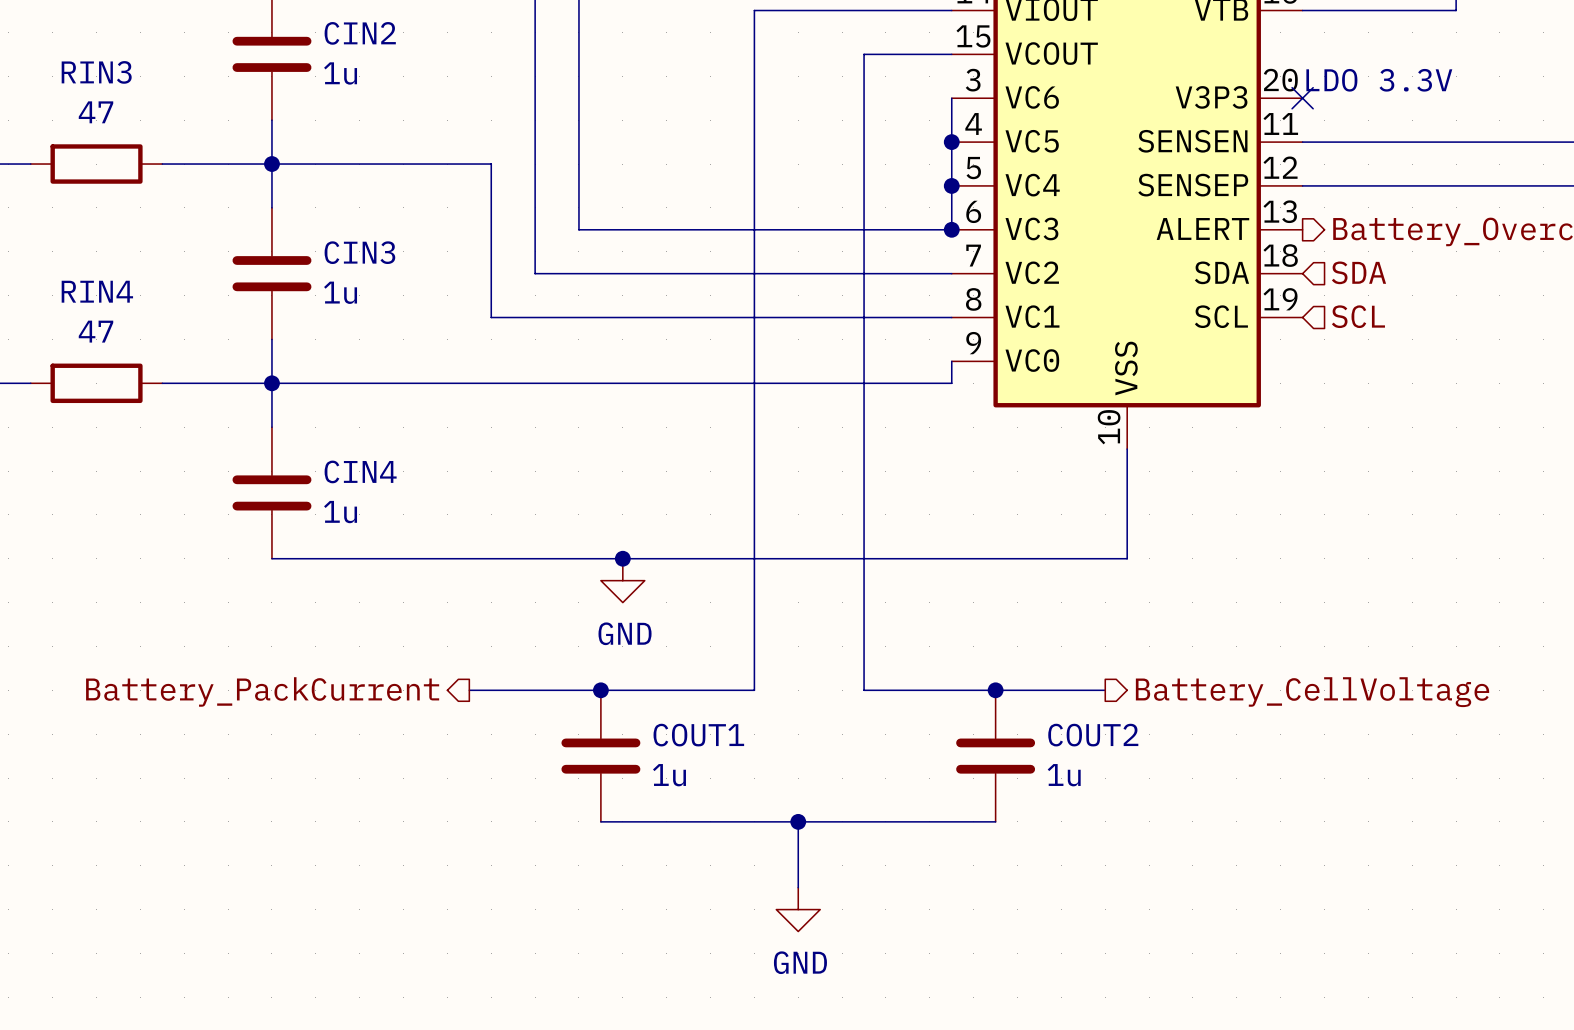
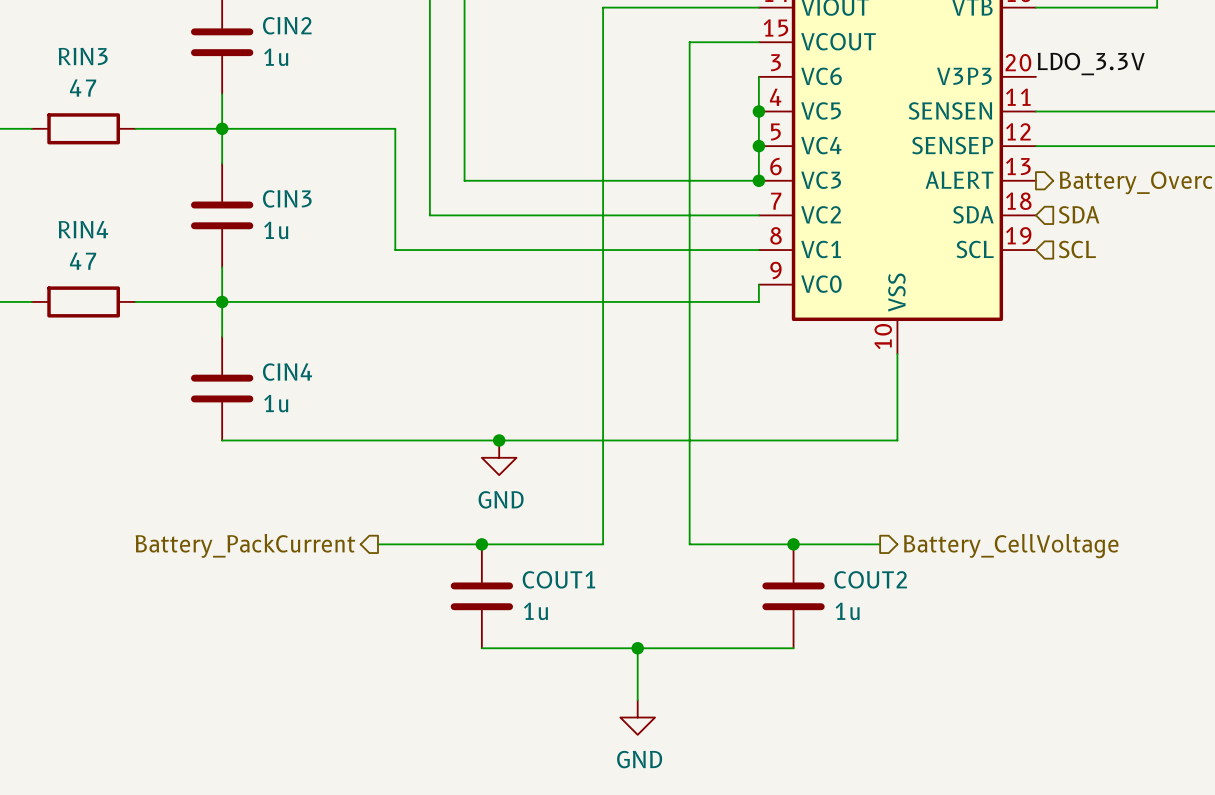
text: LDO 3.3V (1379, 80) -> none
label: none -> LDO_3.3V (1091, 64)
no-connect mark: (1302, 98) -> none

